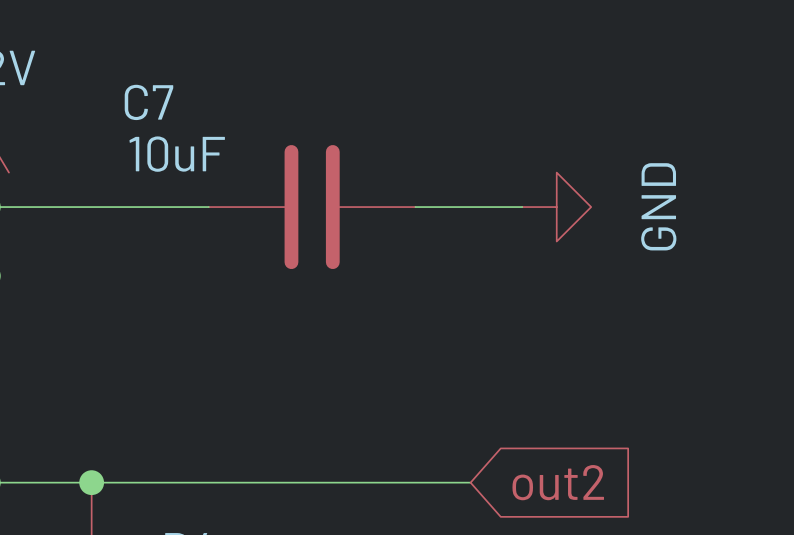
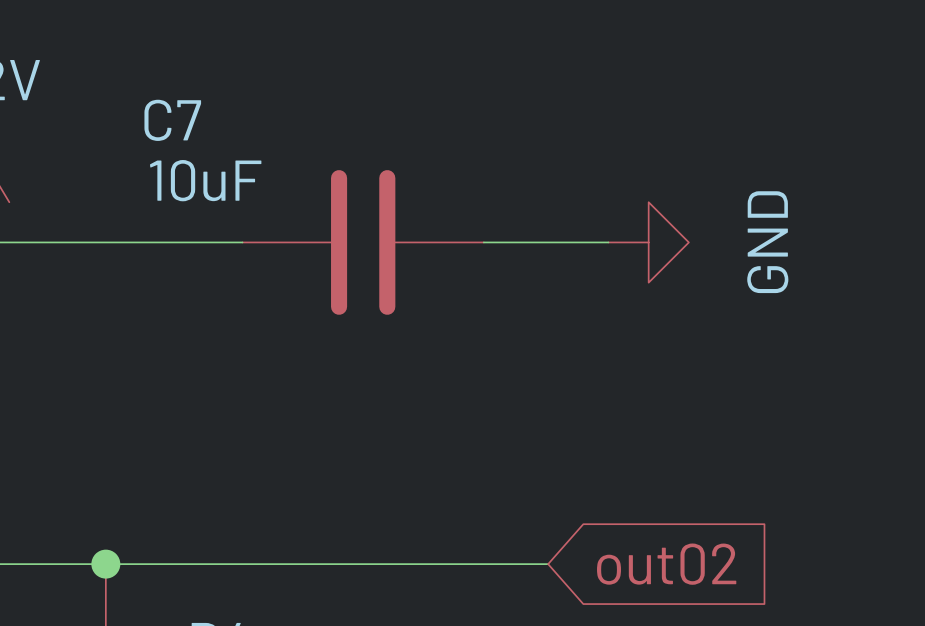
global label: out2 (558, 482) -> out02 (666, 564)

